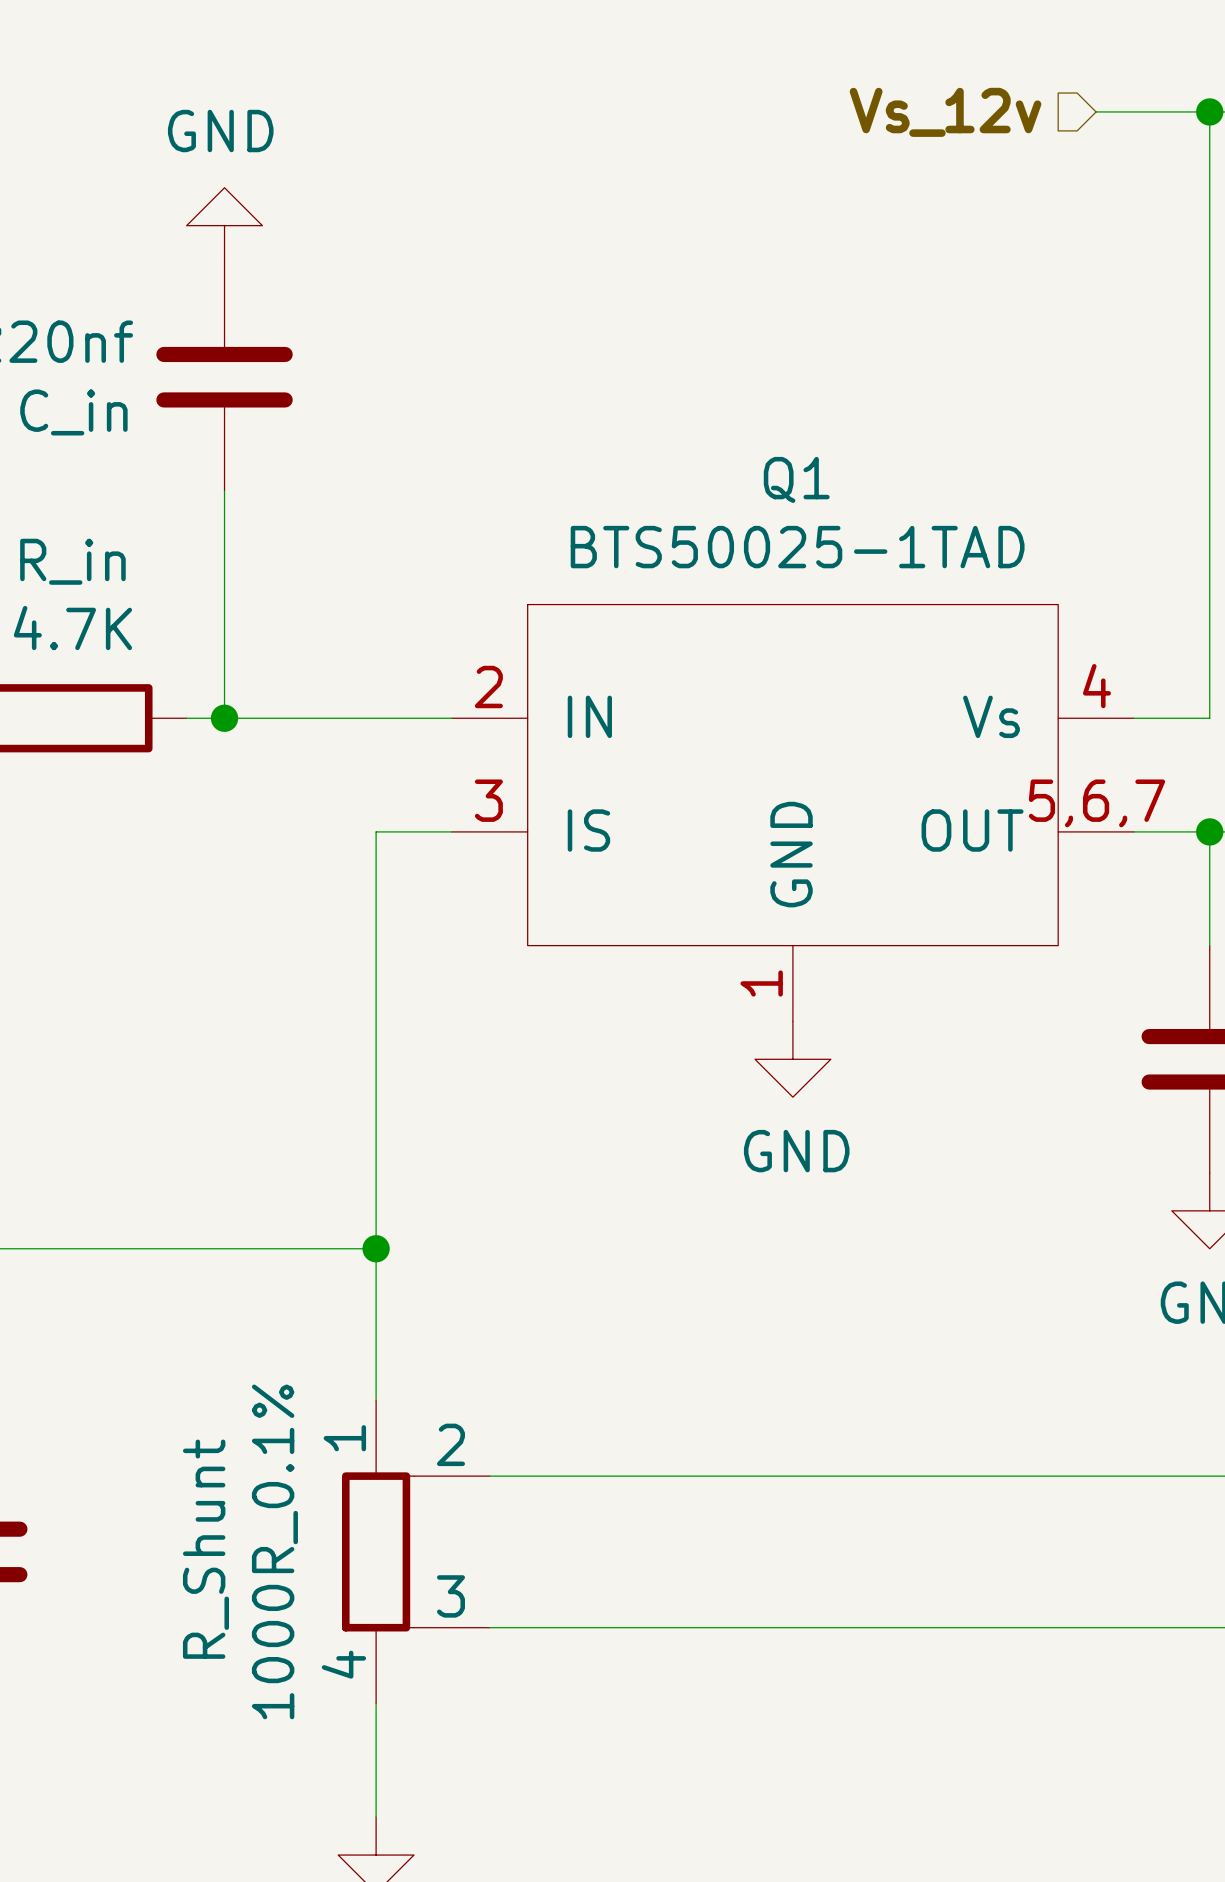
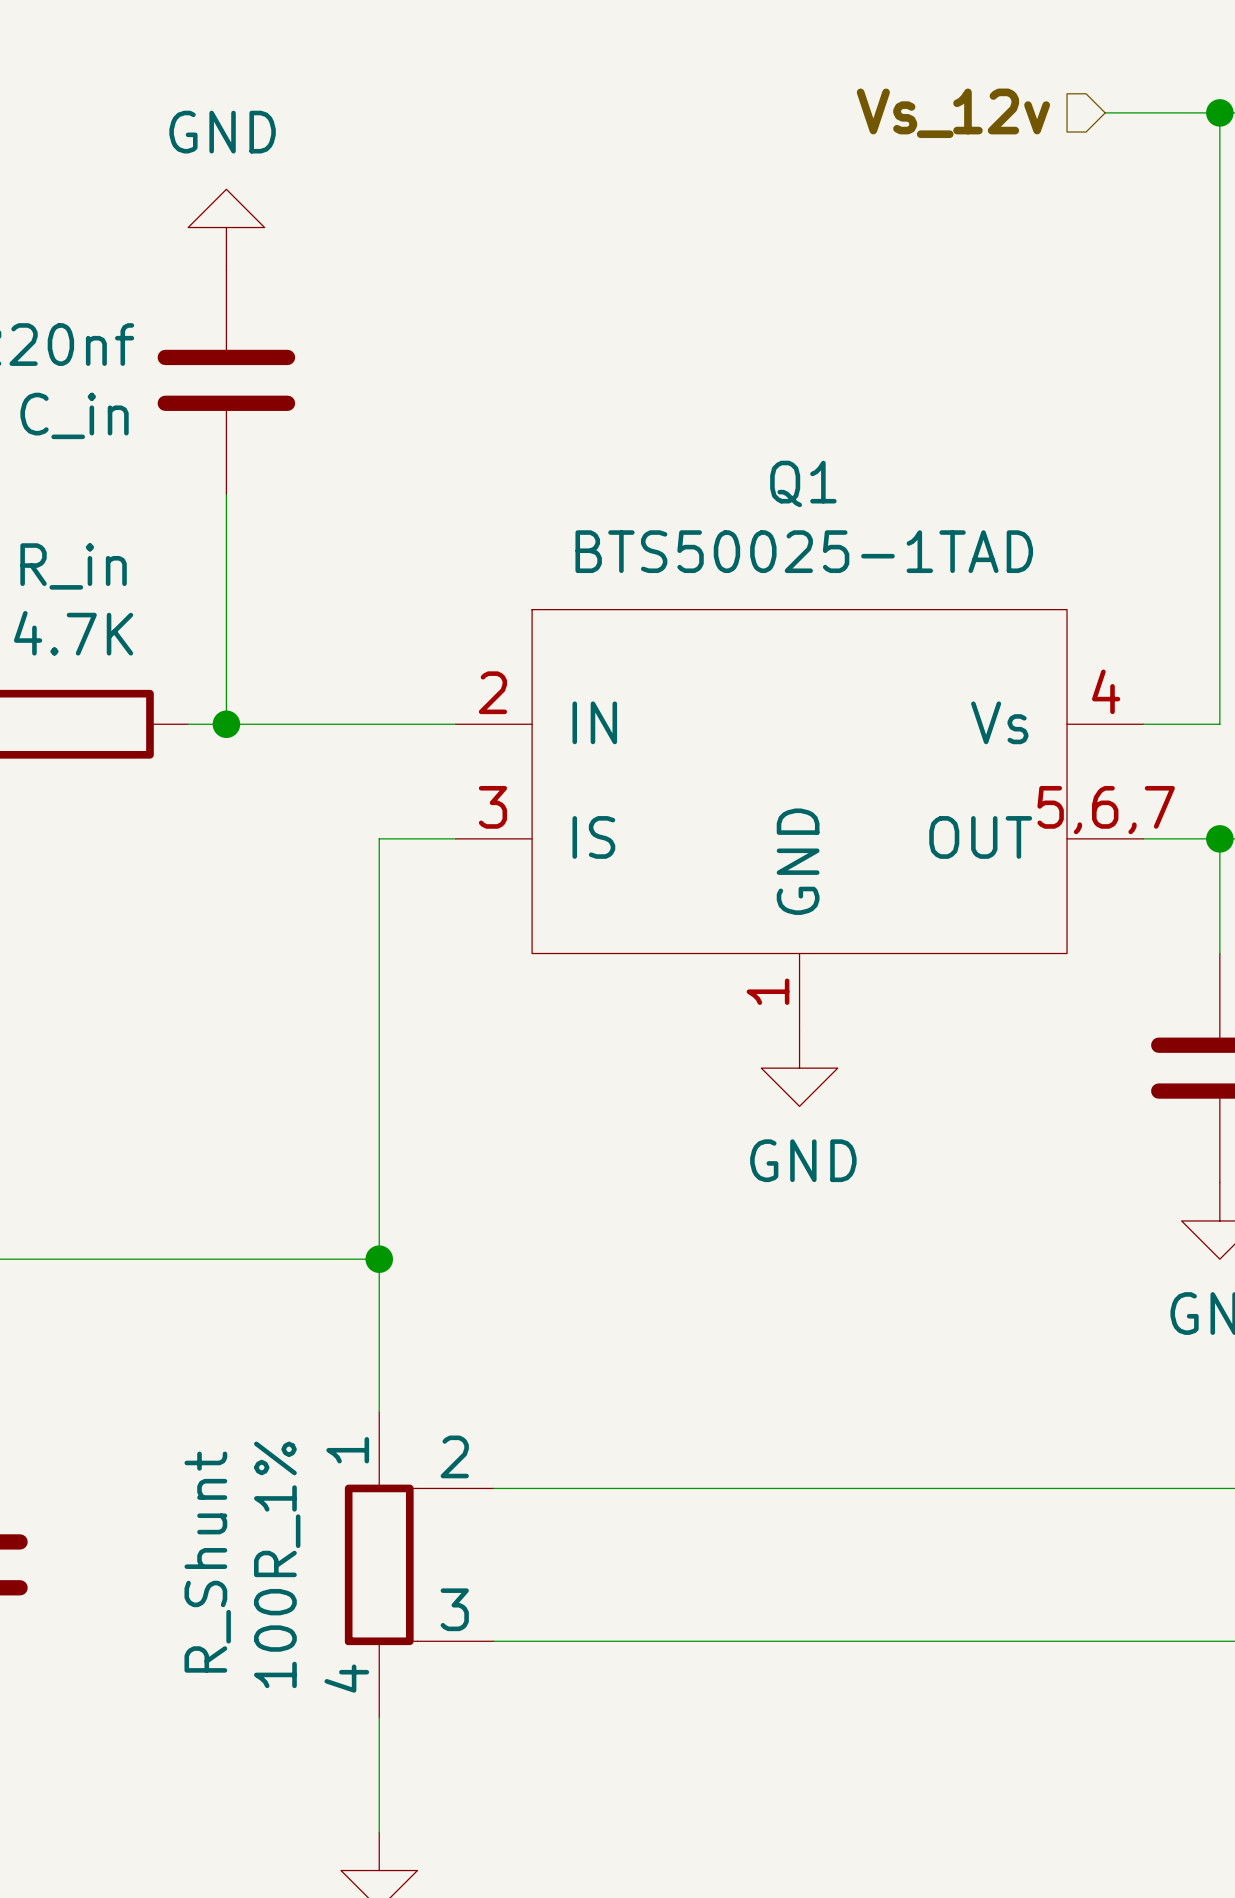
R_Shunt value: 1000R_0.1% (274, 1551) -> 100R_1% (277, 1564)

